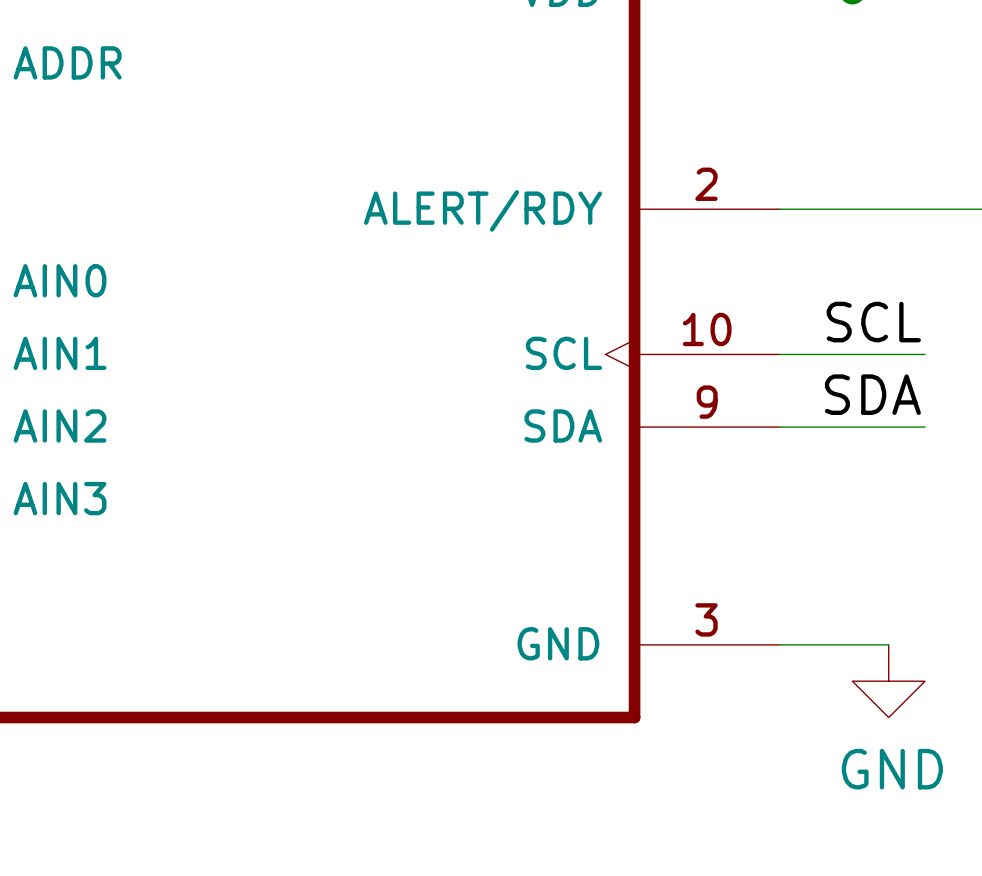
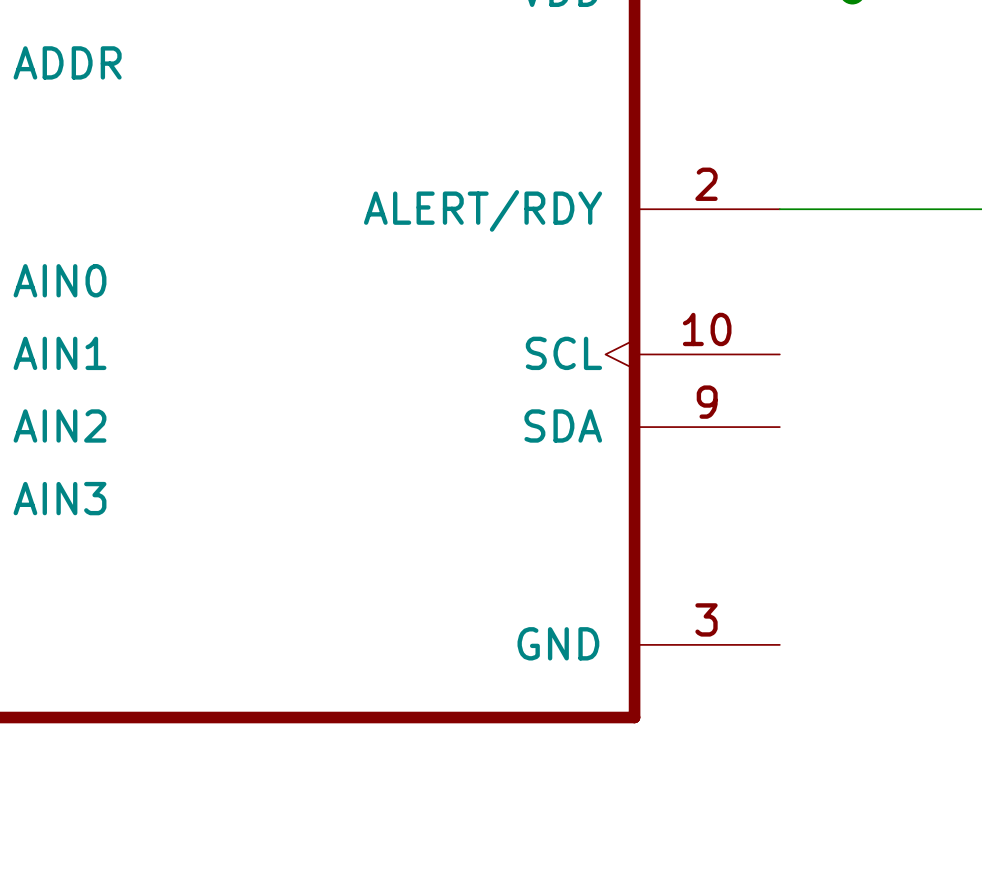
label: SCL (873, 322) -> none
wire: (779, 354) (925, 354) -> none
label: SDA (872, 394) -> none
wire: (779, 427) (925, 427) -> none
wire: (779, 644) (888, 644) -> none
power symbol: GND (888, 681) -> none

